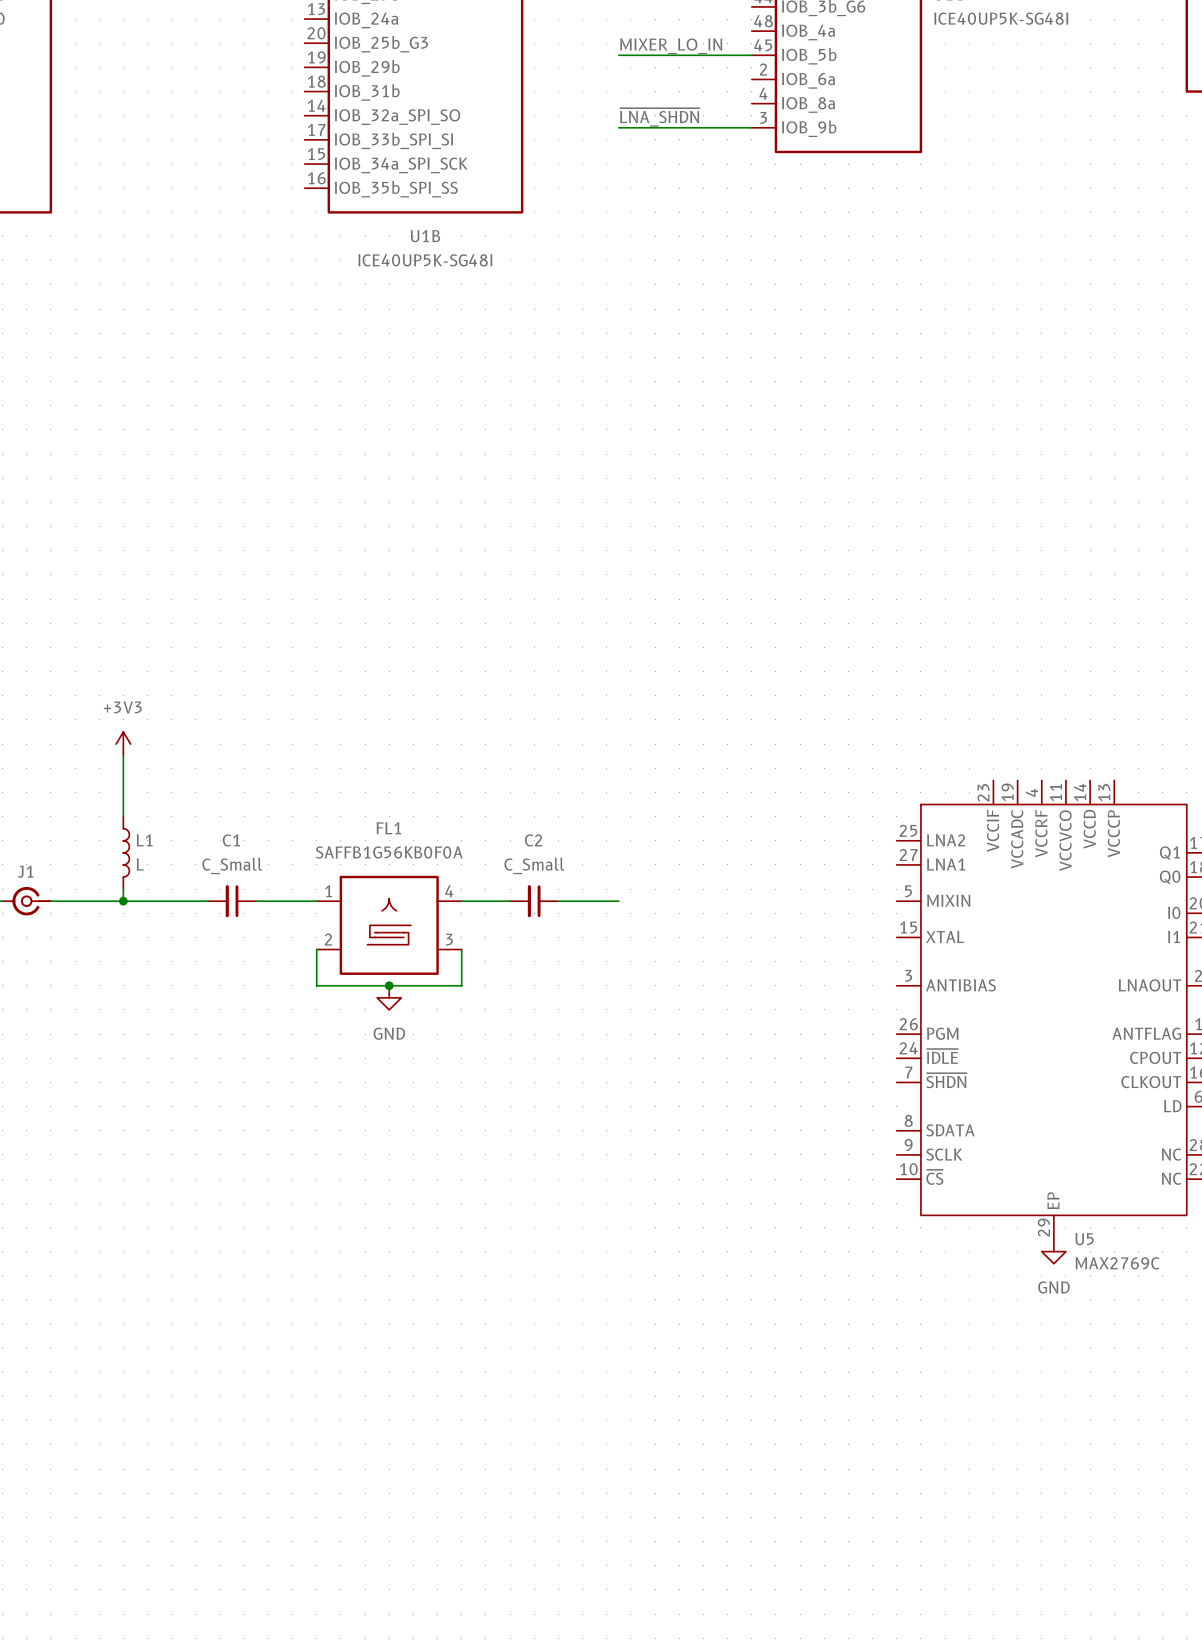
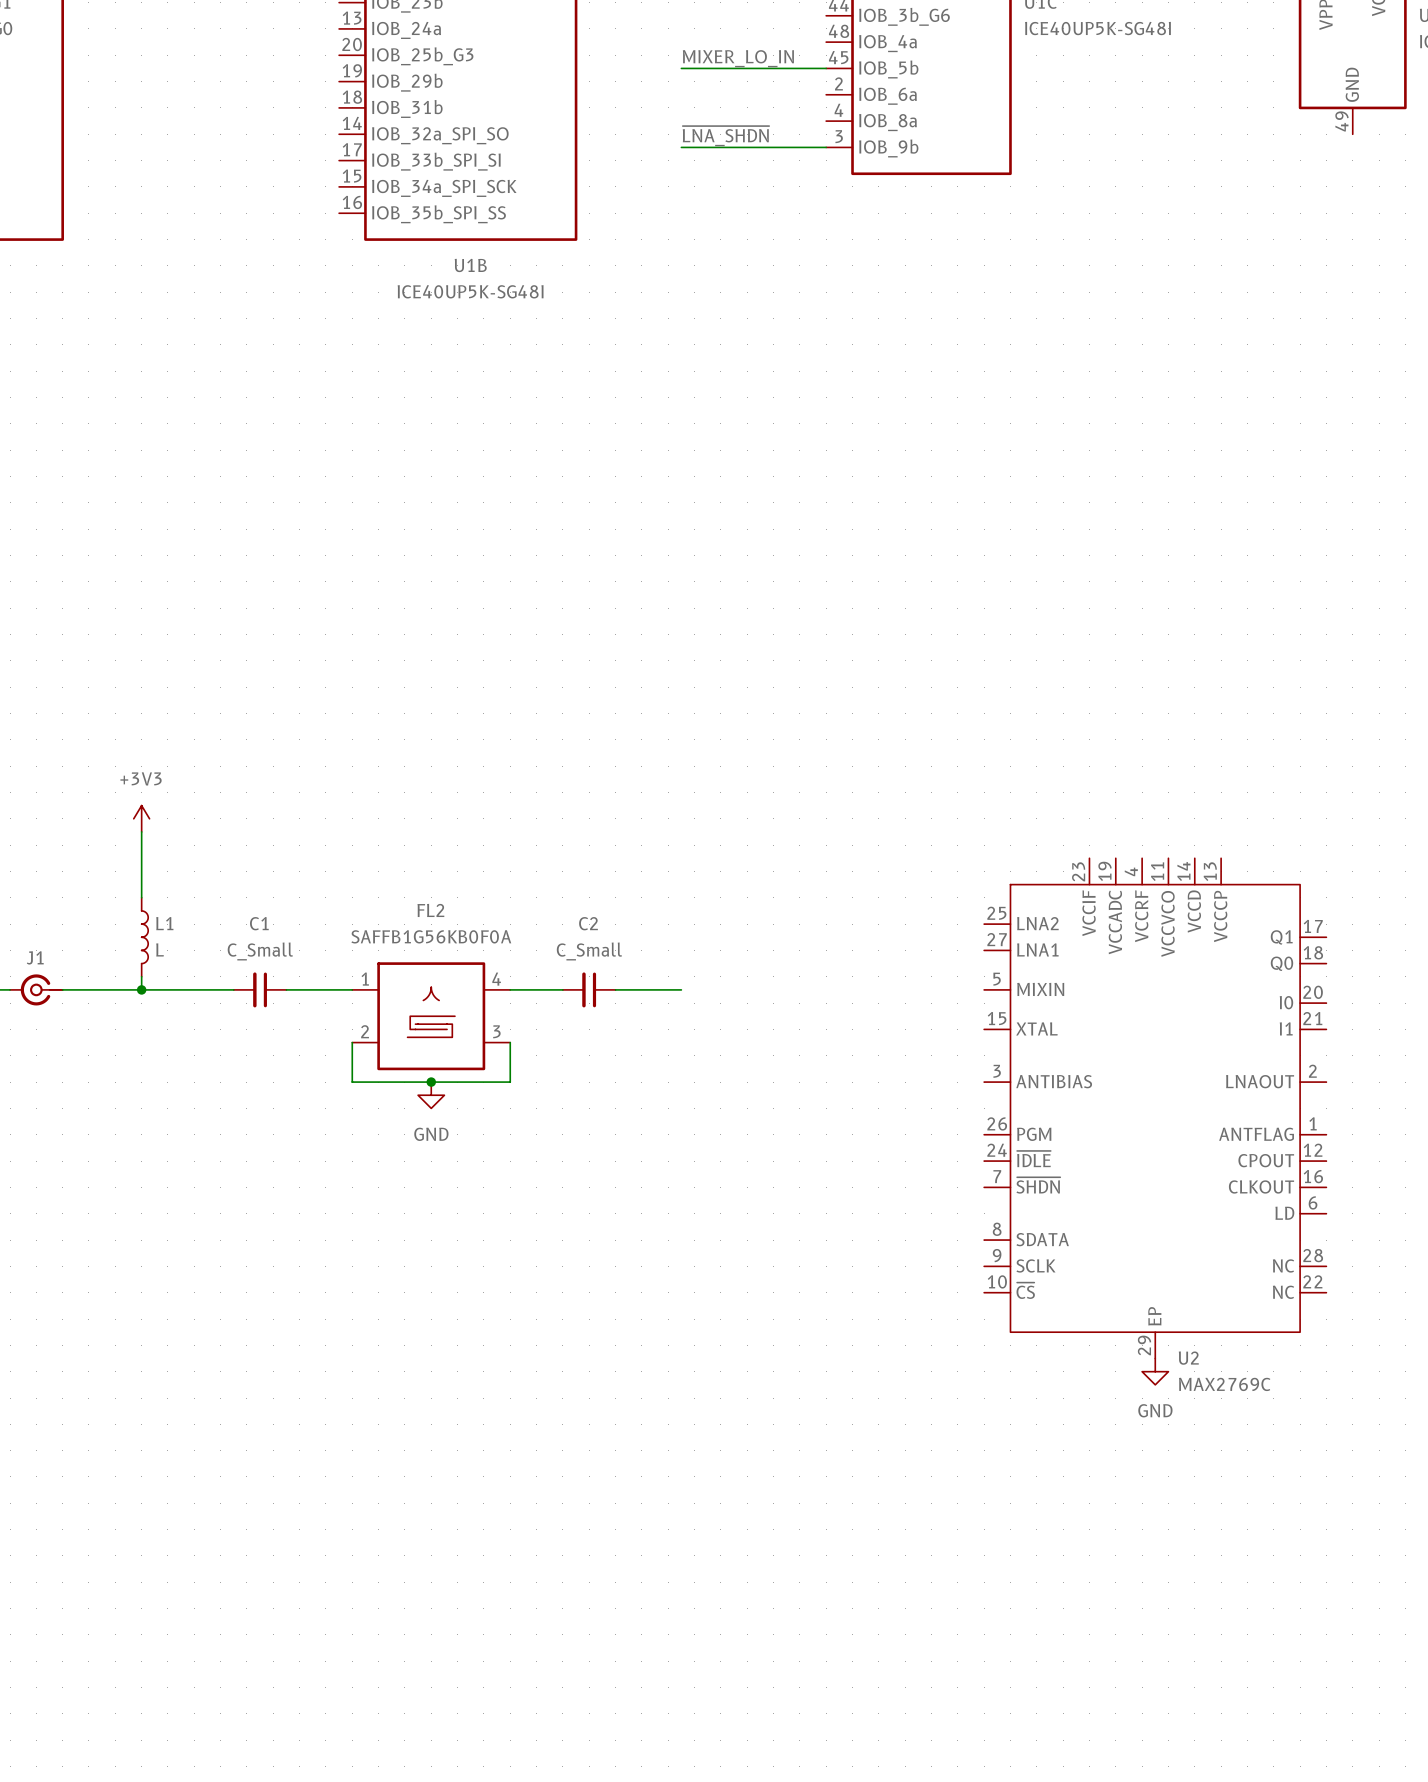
FL1 name: FL1 (388, 828) -> FL2 (430, 910)
U5 name: U5 (1084, 1239) -> U2 (1188, 1358)

